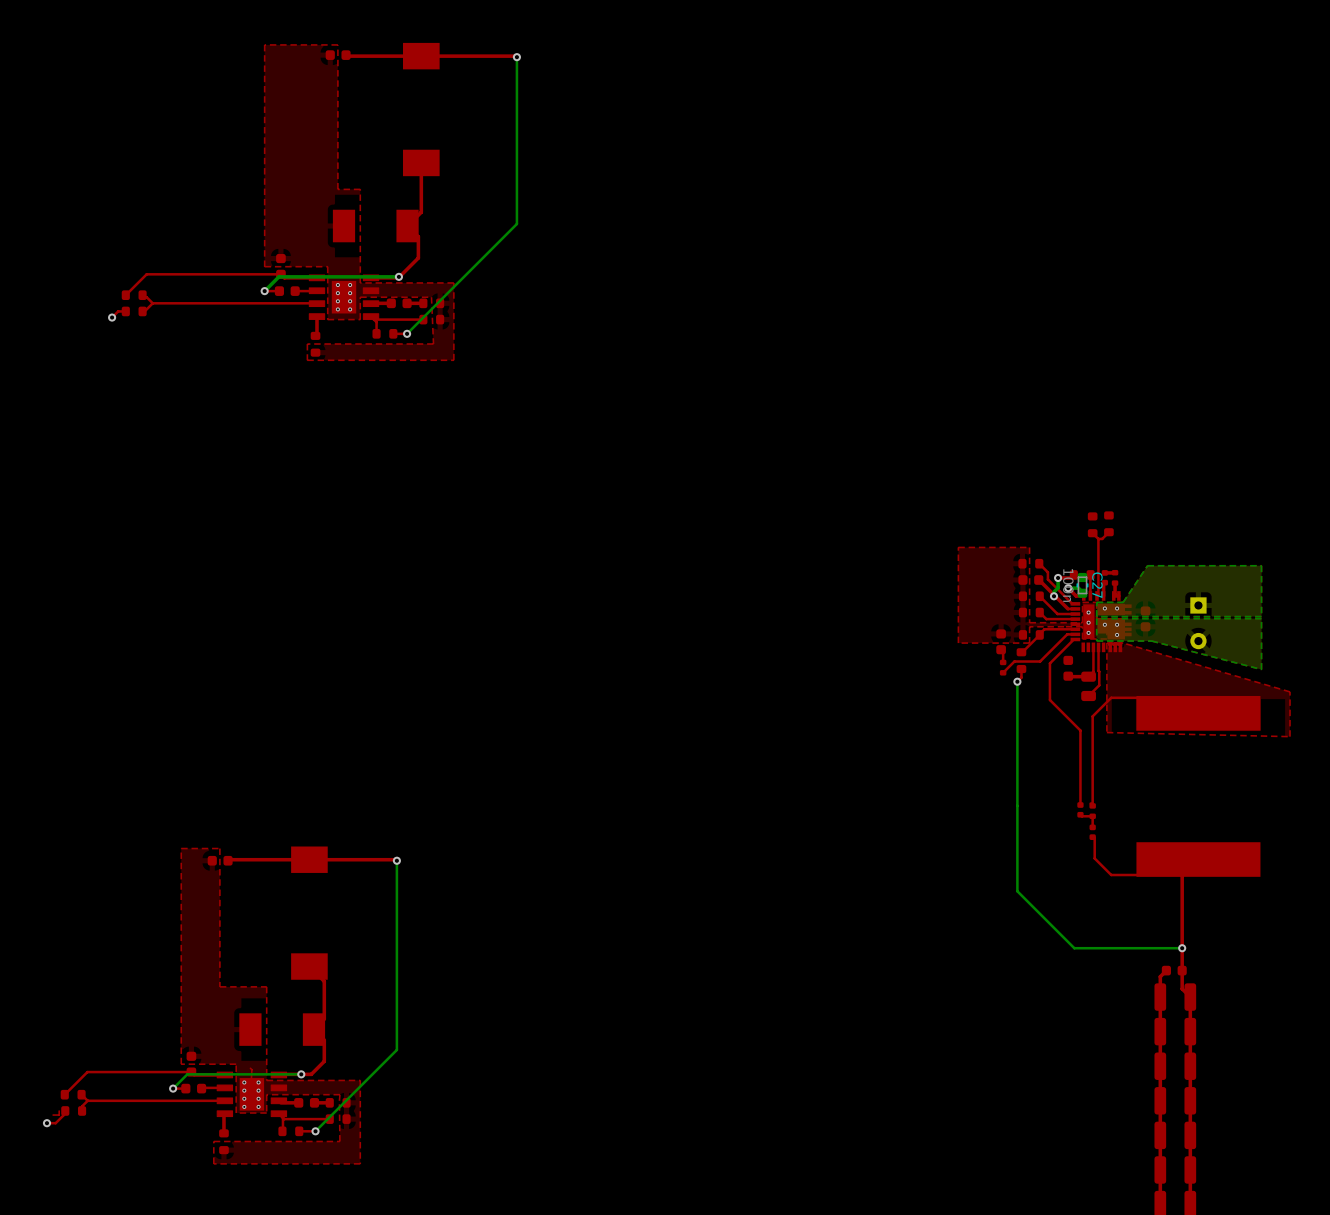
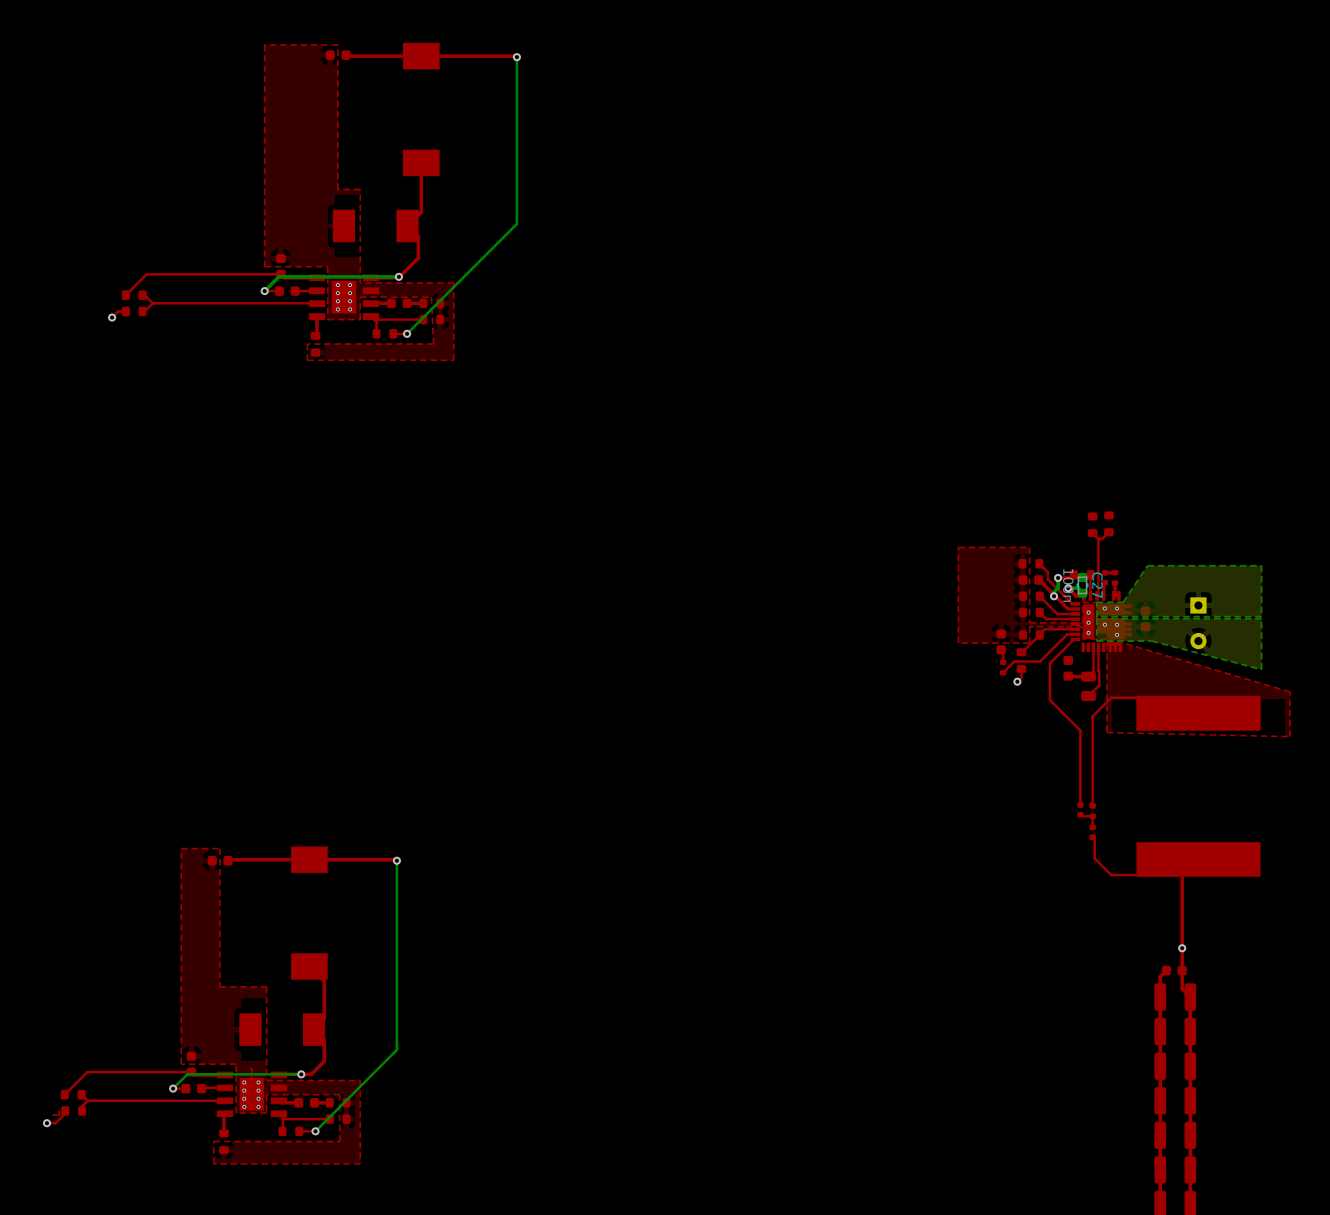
bottom track: (1017, 681) (1017, 891) (1074, 948) (1182, 948) -> none

